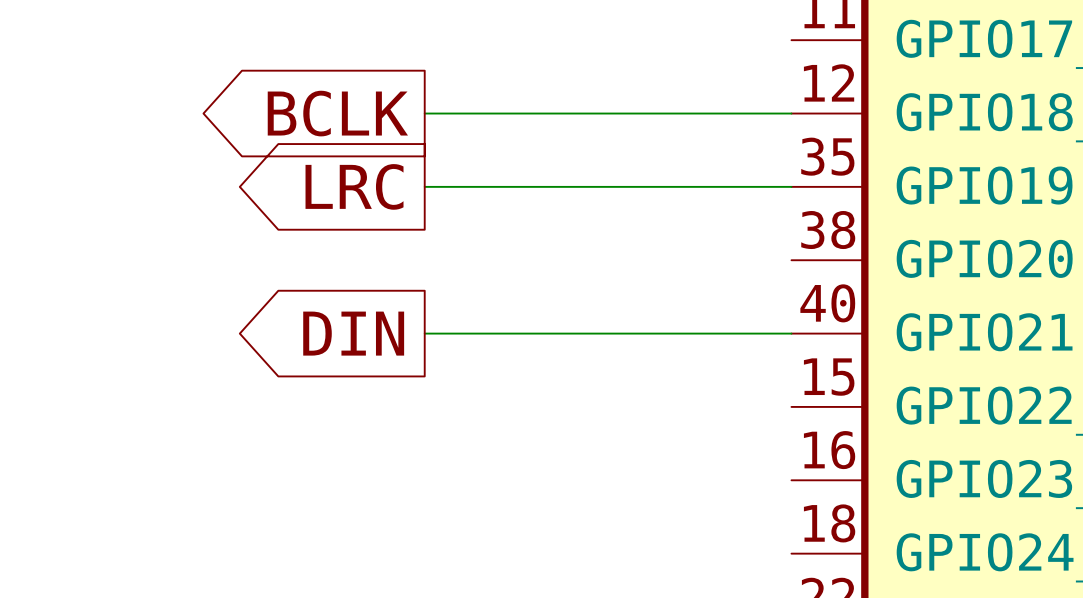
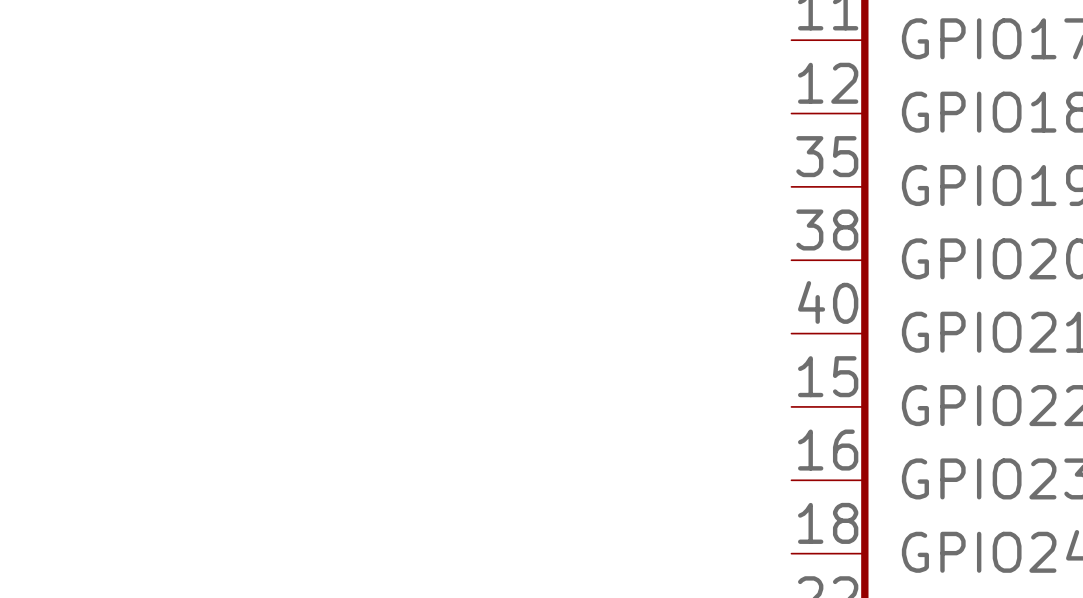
global label: BCLK (337, 113) -> none
wire: (424, 113) (791, 113) -> none
global label: LRC (354, 186) -> none
wire: (424, 186) (791, 186) -> none
global label: DIN (353, 333) -> none
wire: (424, 333) (791, 333) -> none

